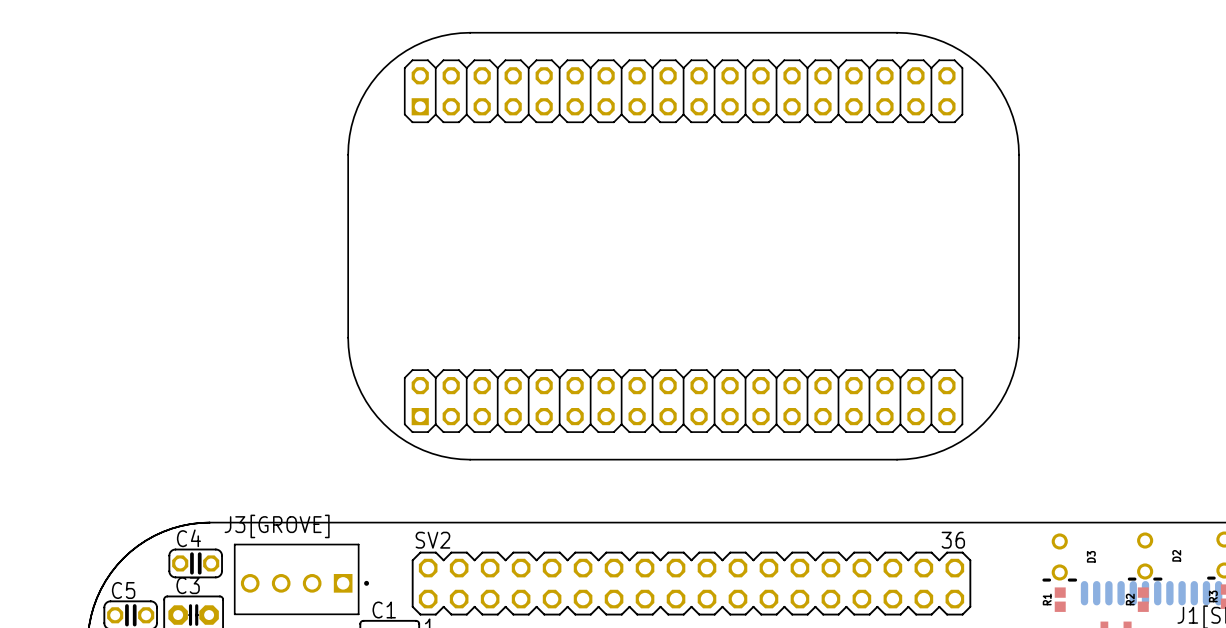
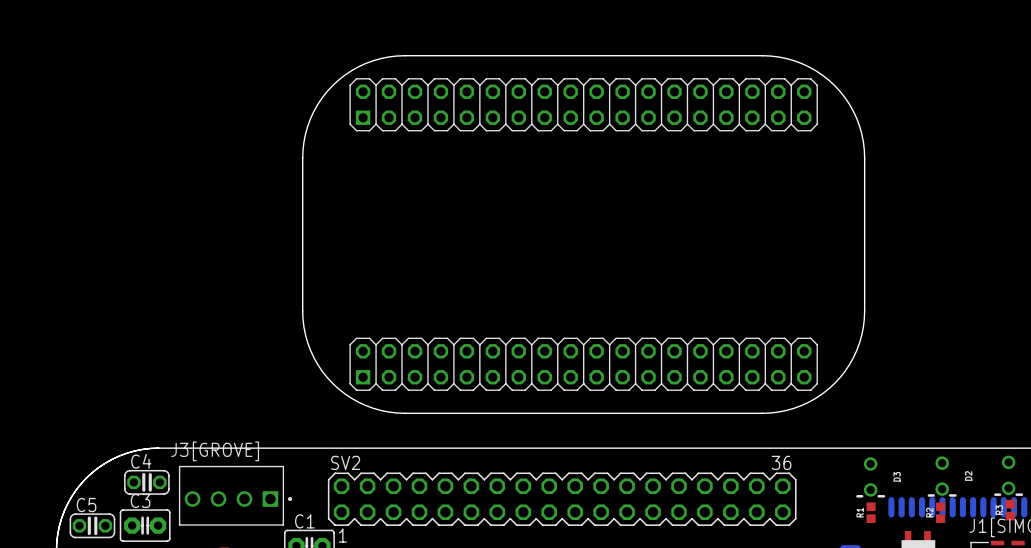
part position: (683, 246) -> (583, 234)

